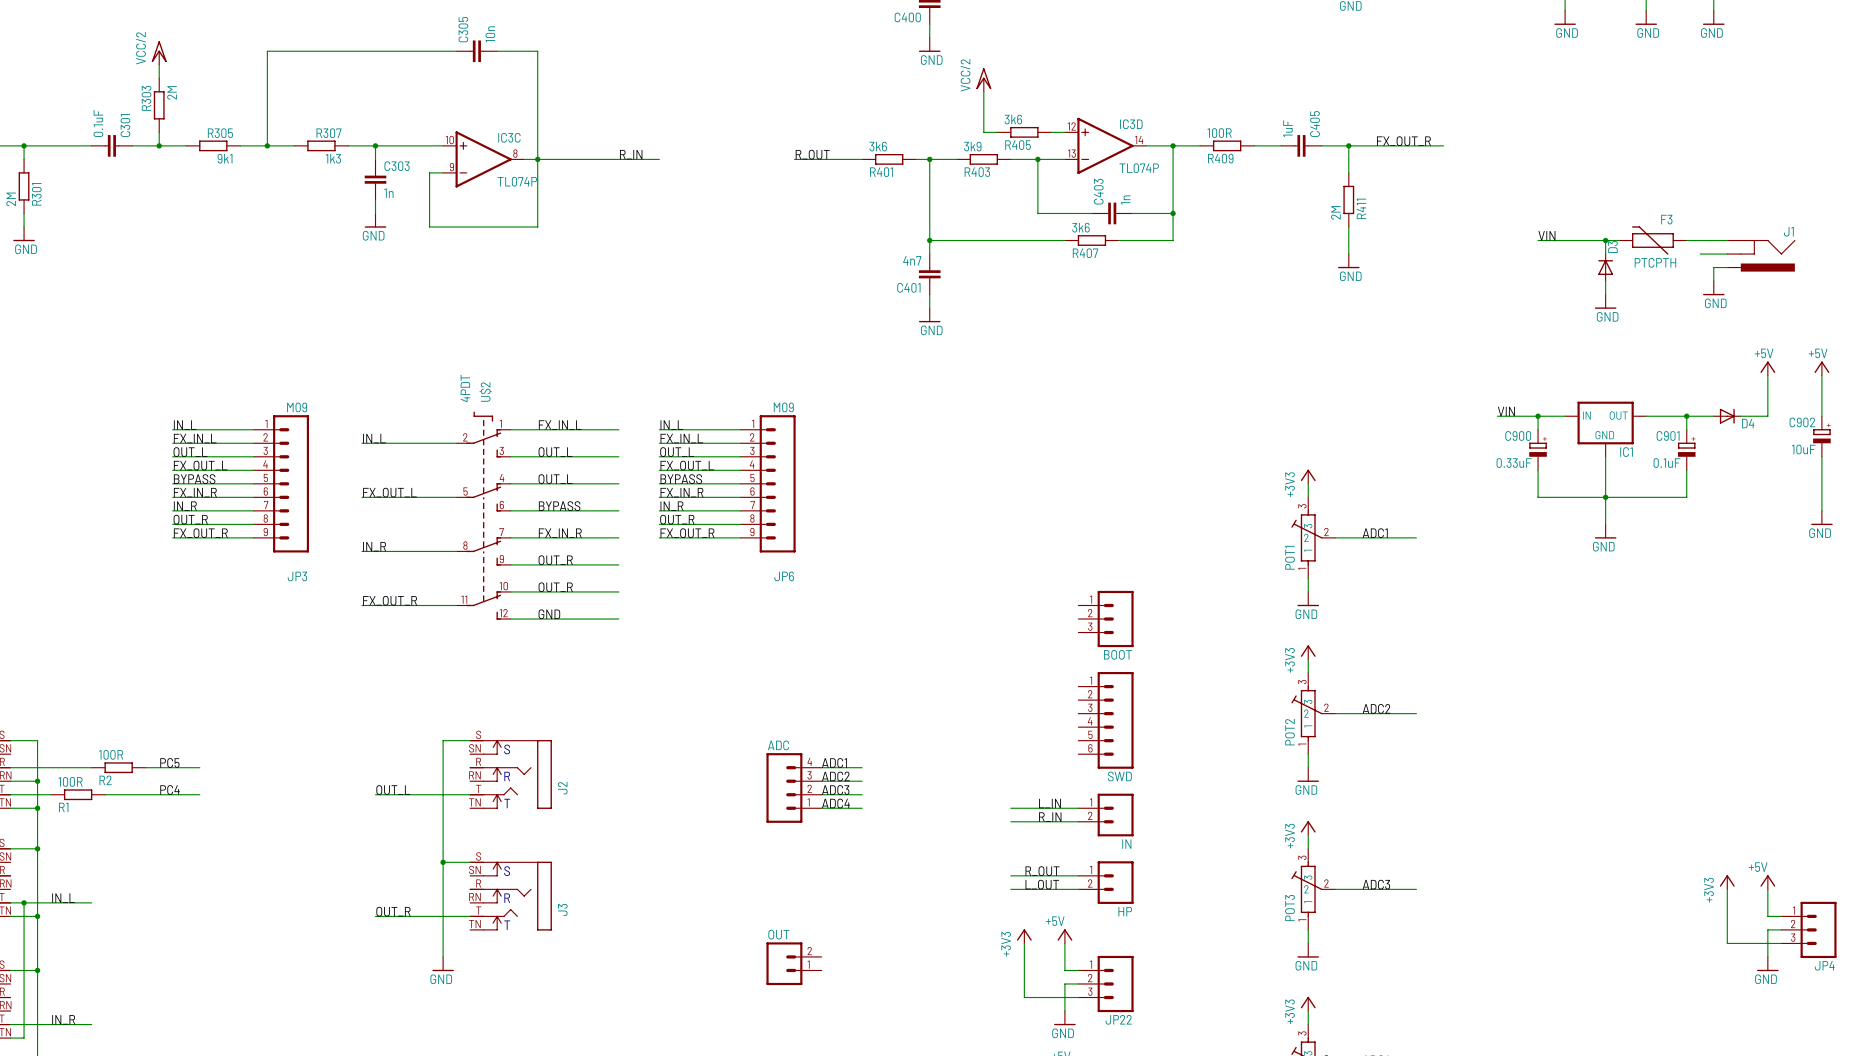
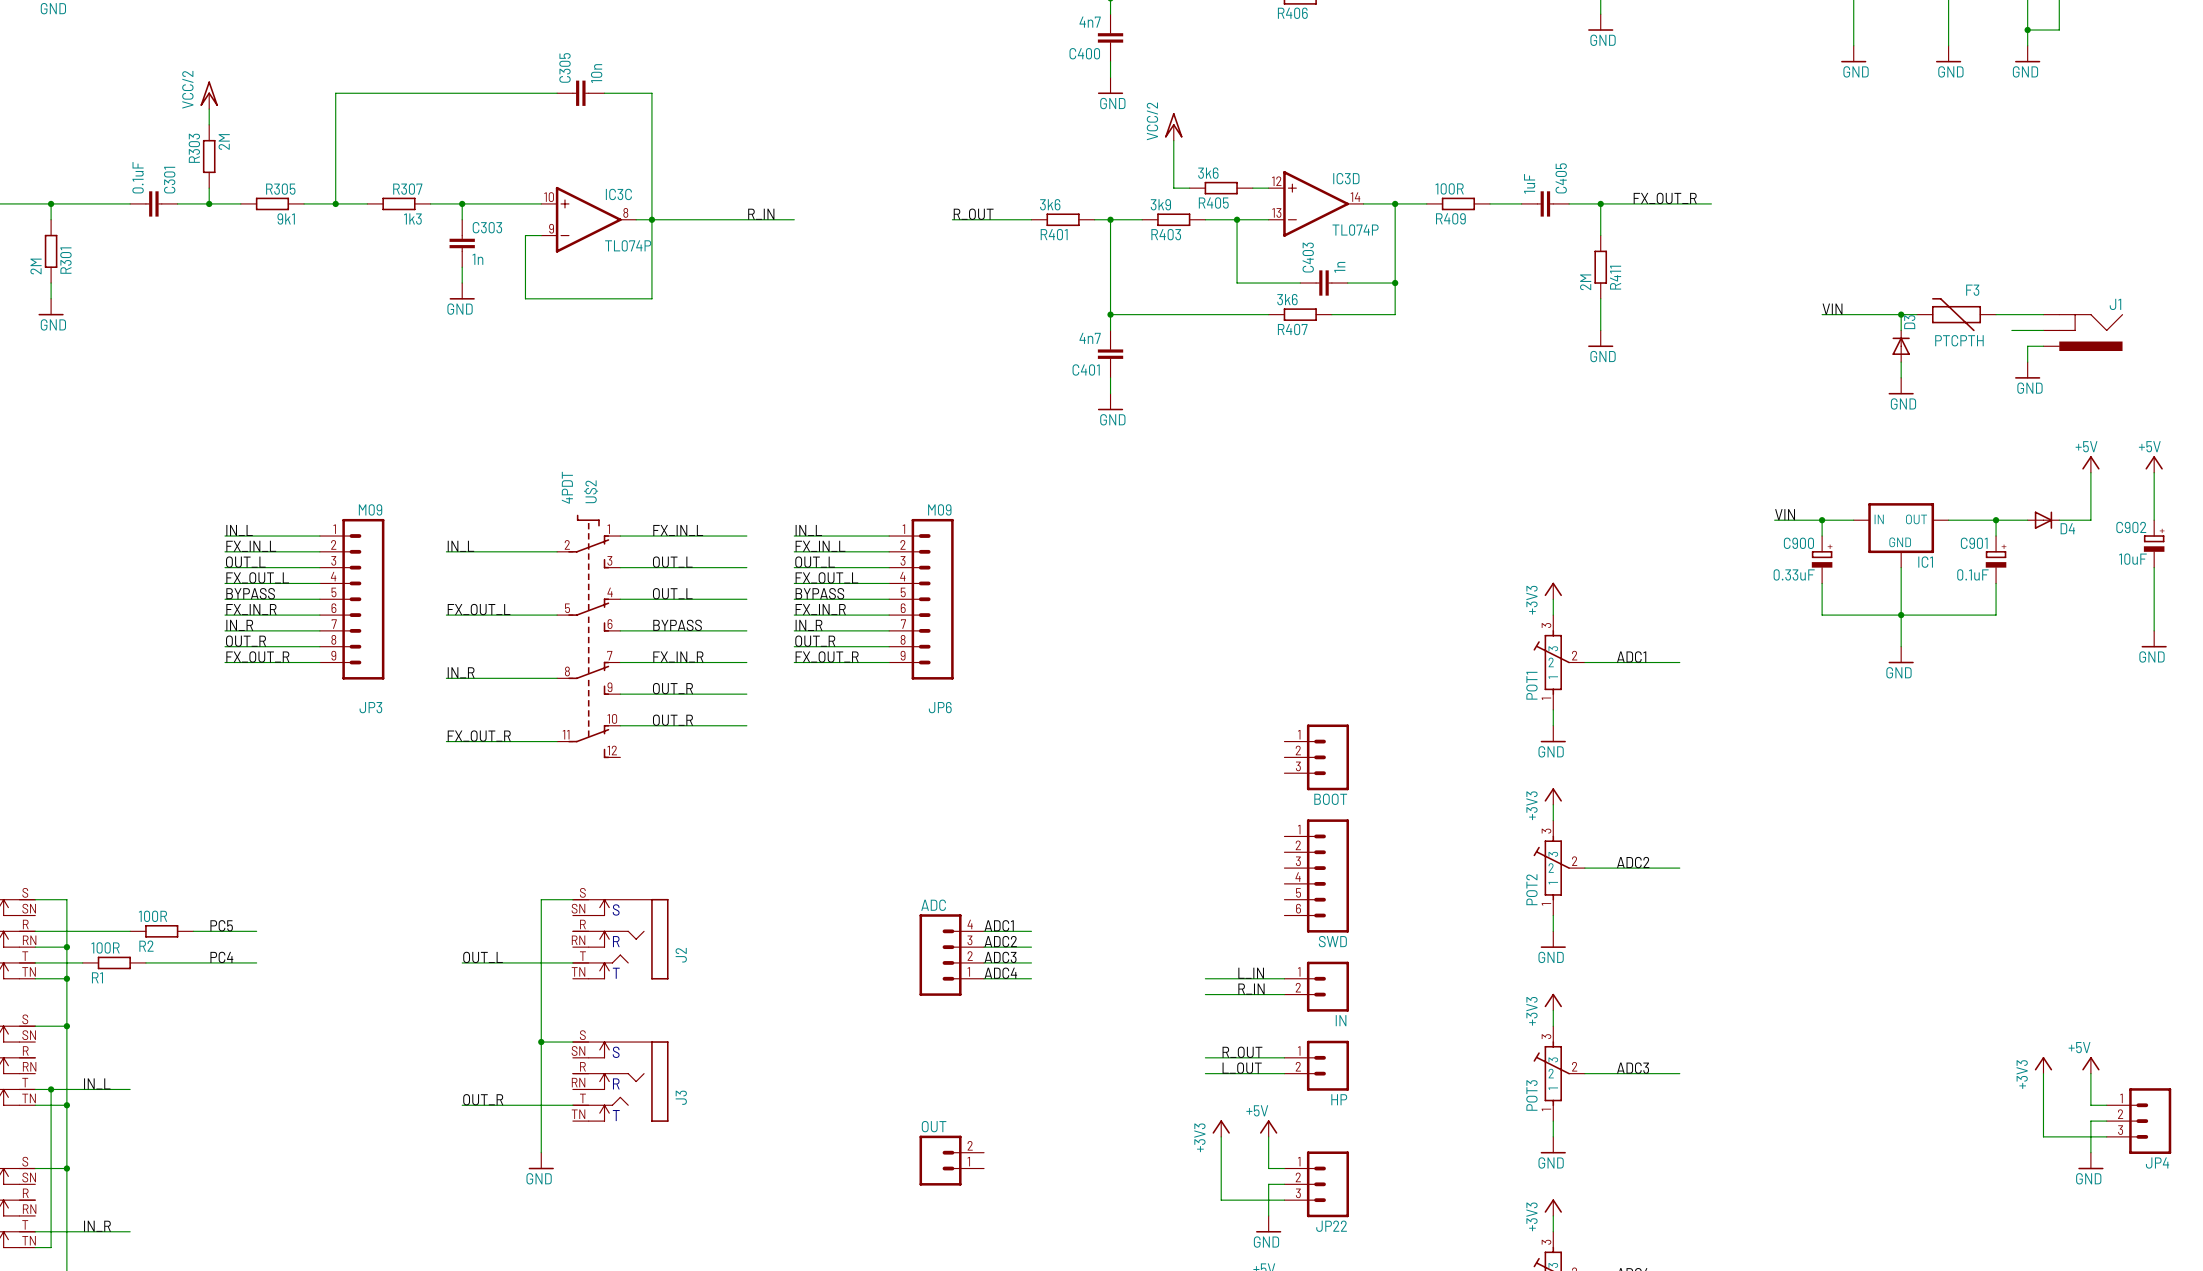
label: GND (549, 614) -> none
wire: (510, 619) (618, 619) -> none

